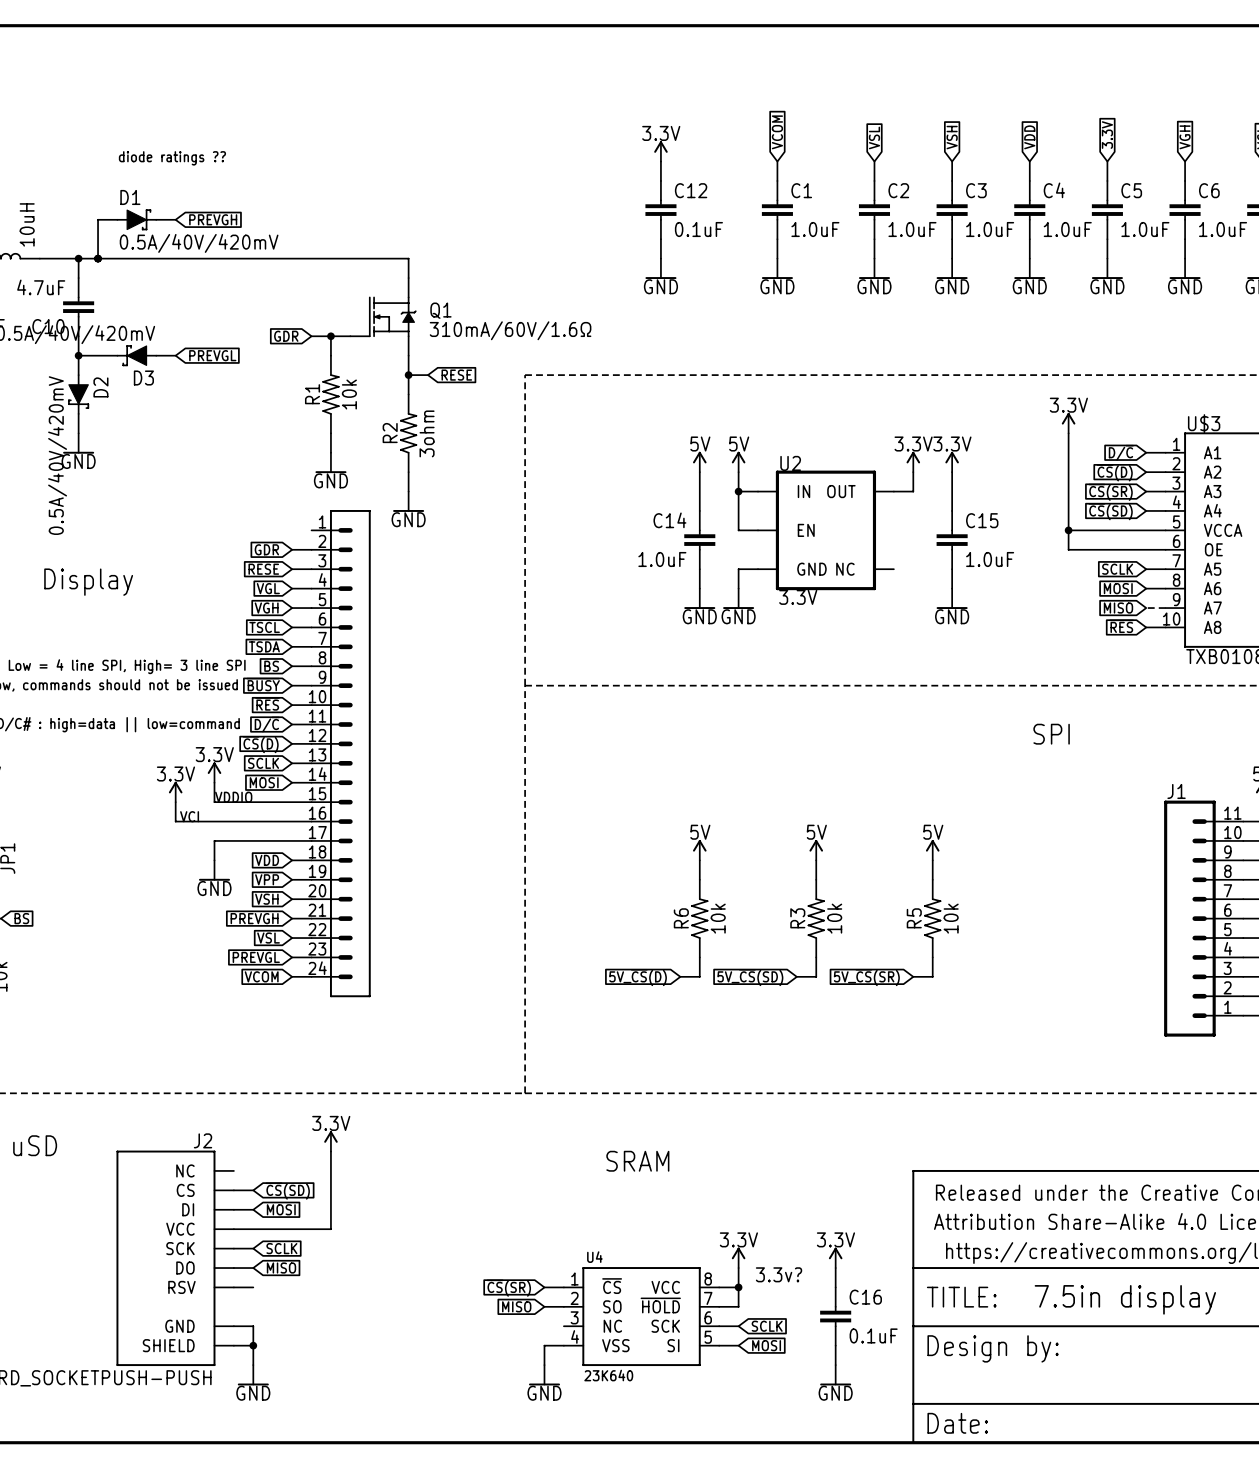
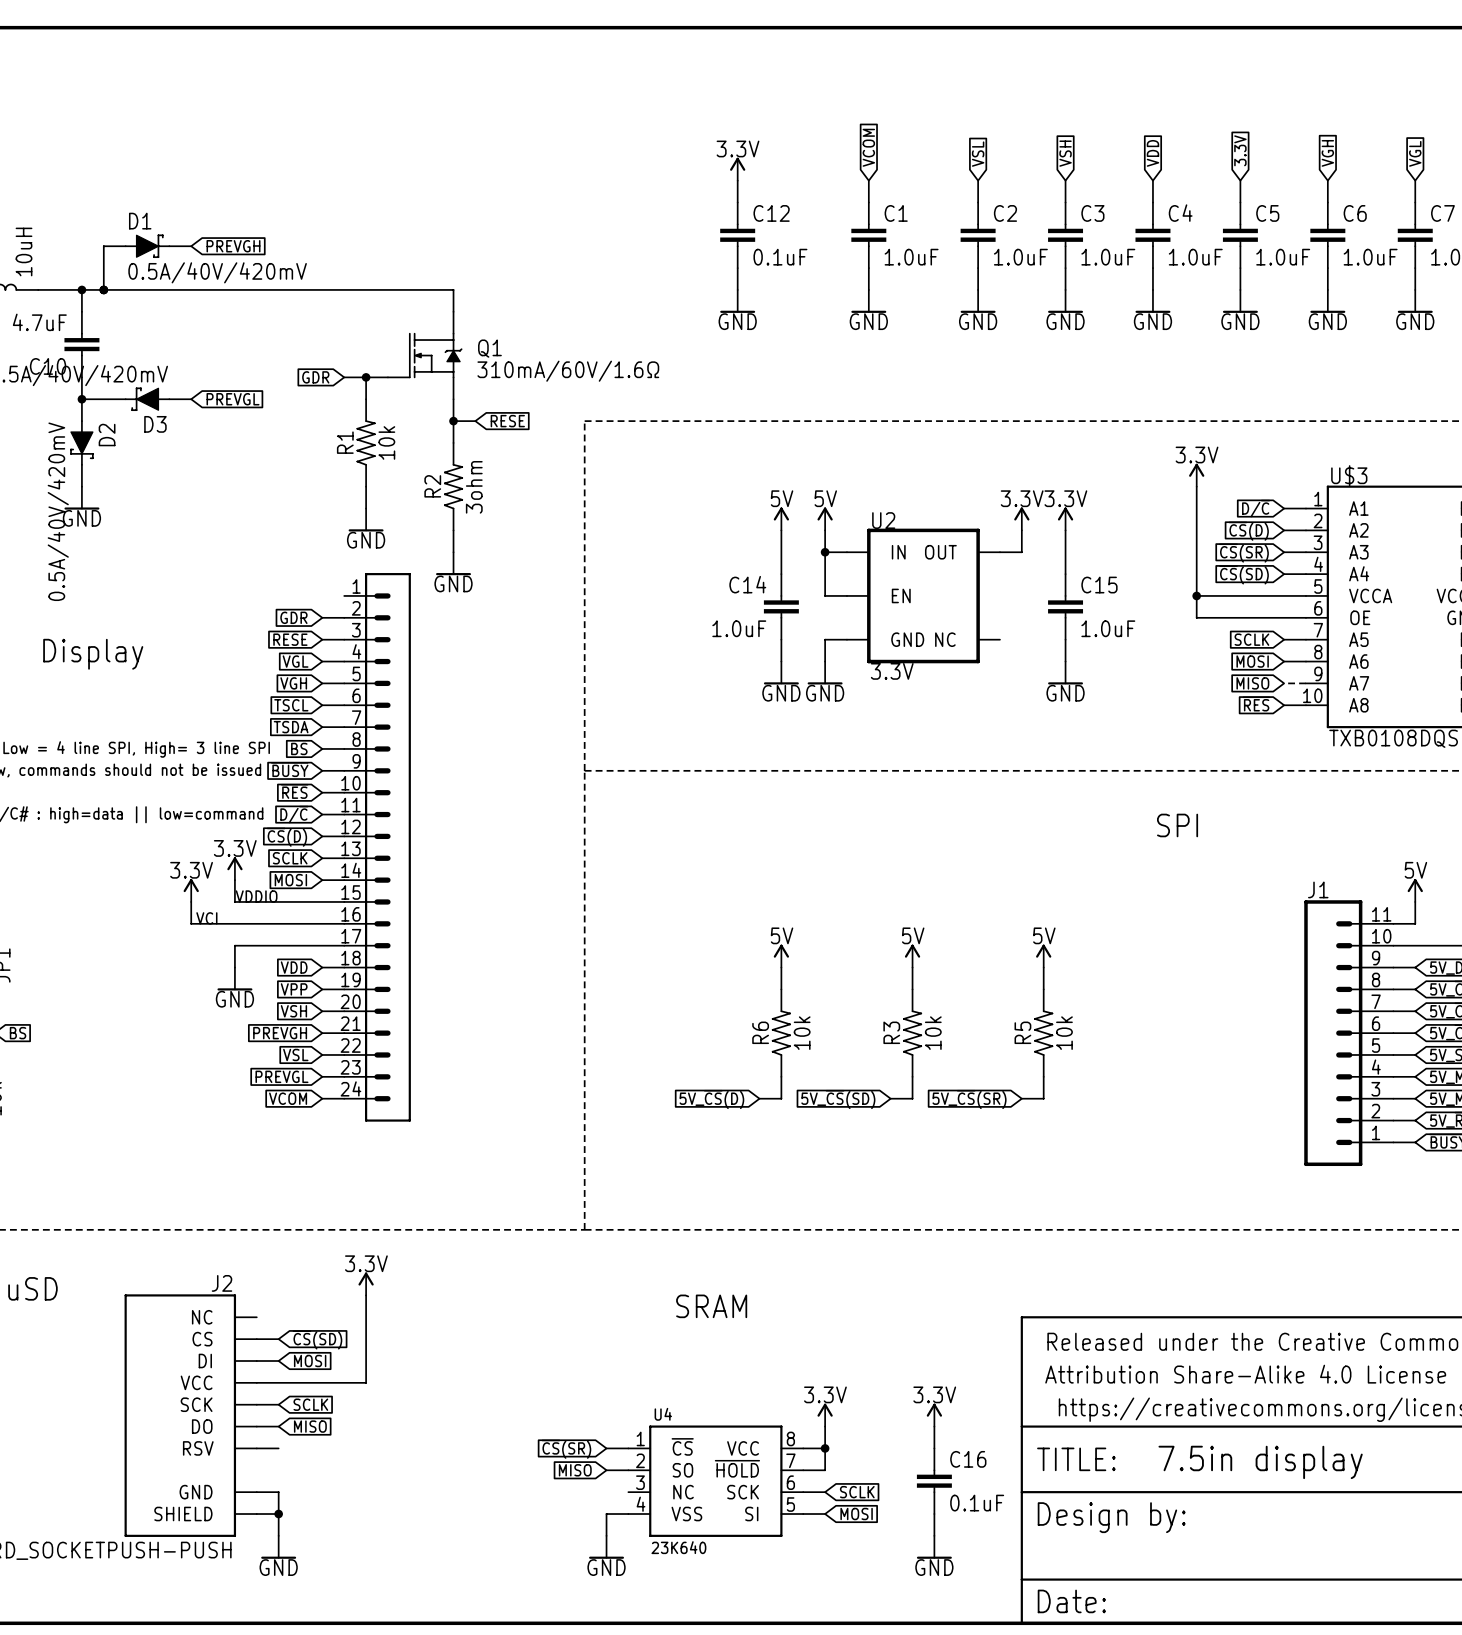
text: diode ratings ?? (172, 158) -> none
text: 3.3v? (779, 1274) -> none

